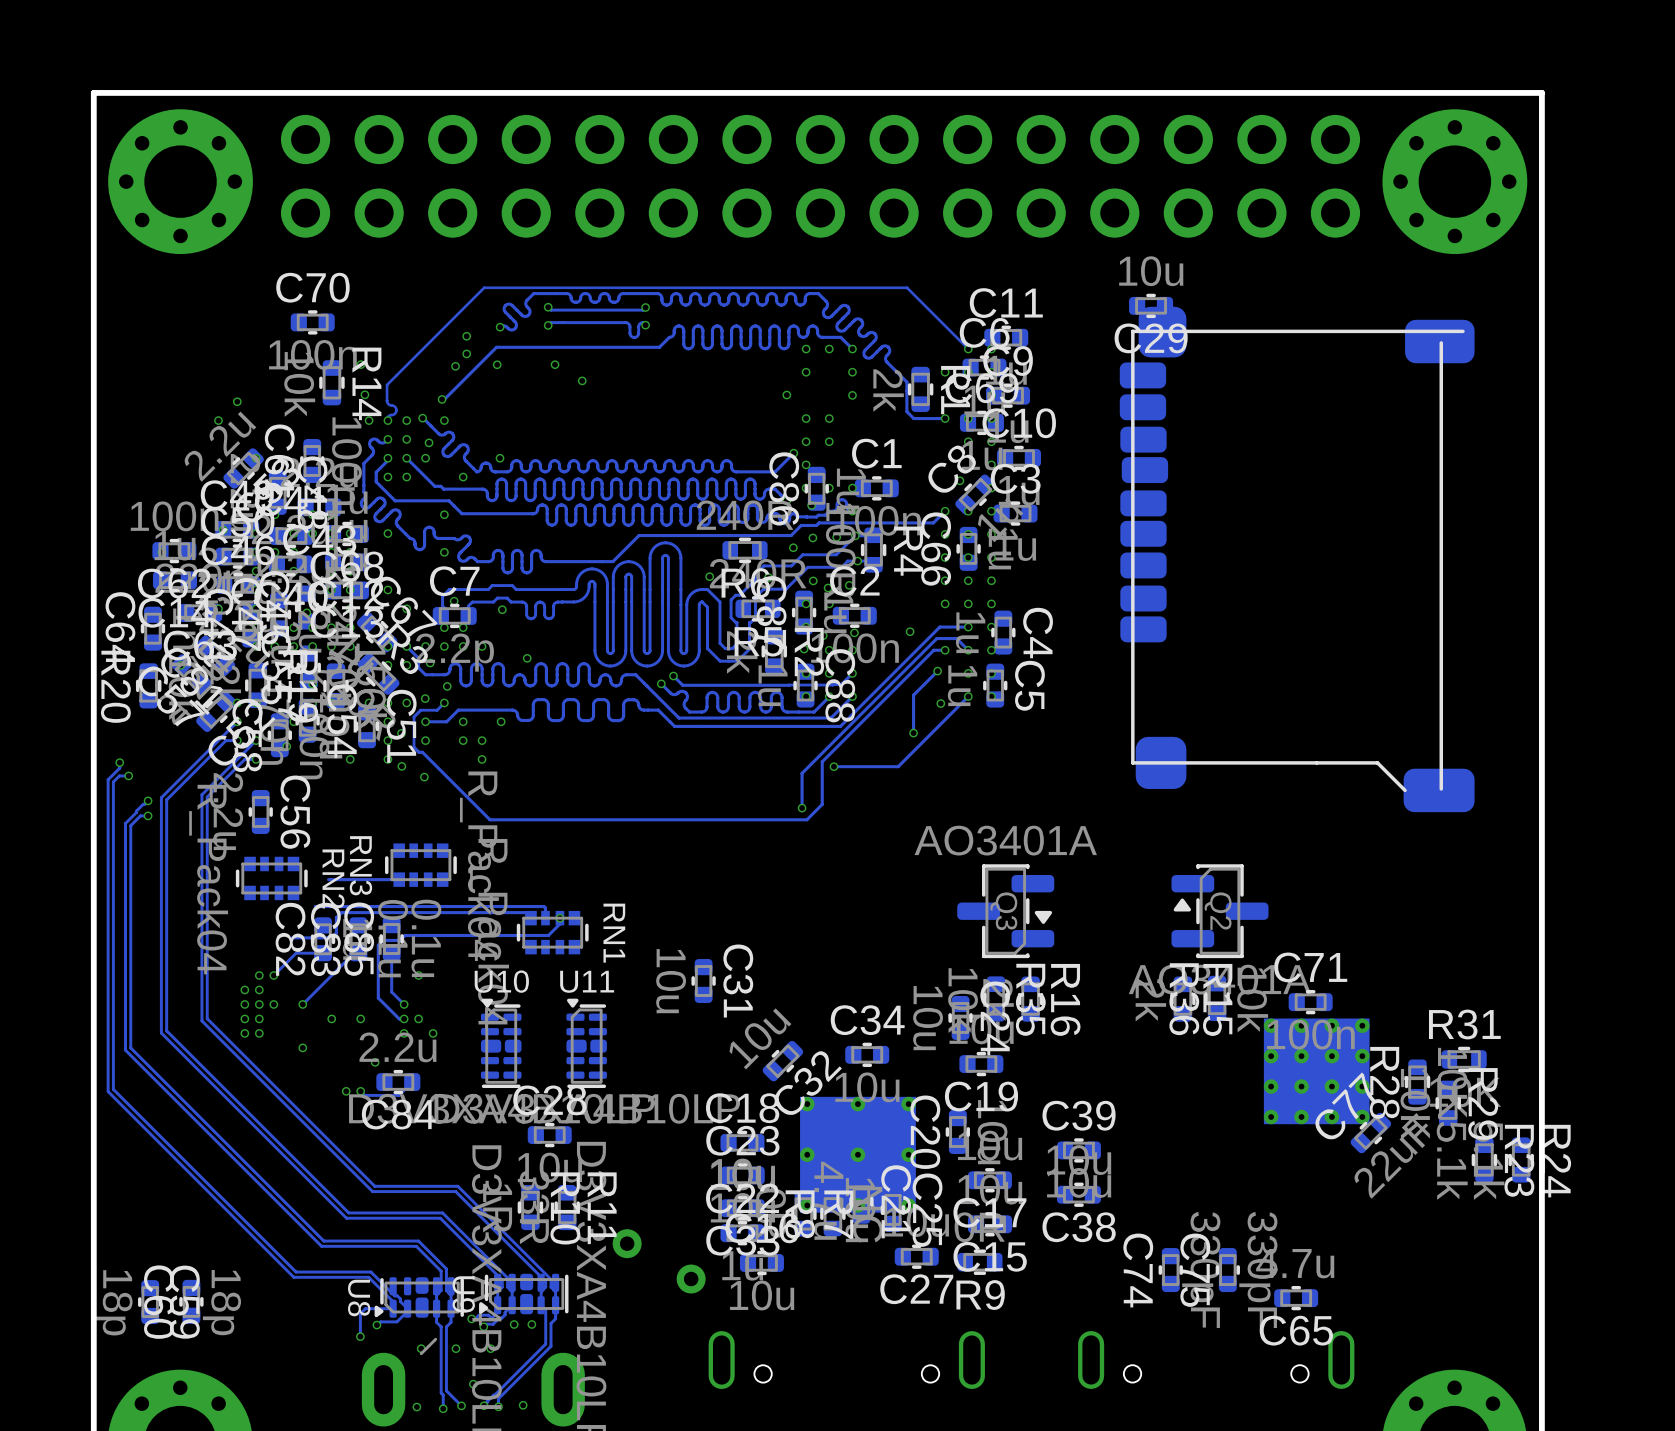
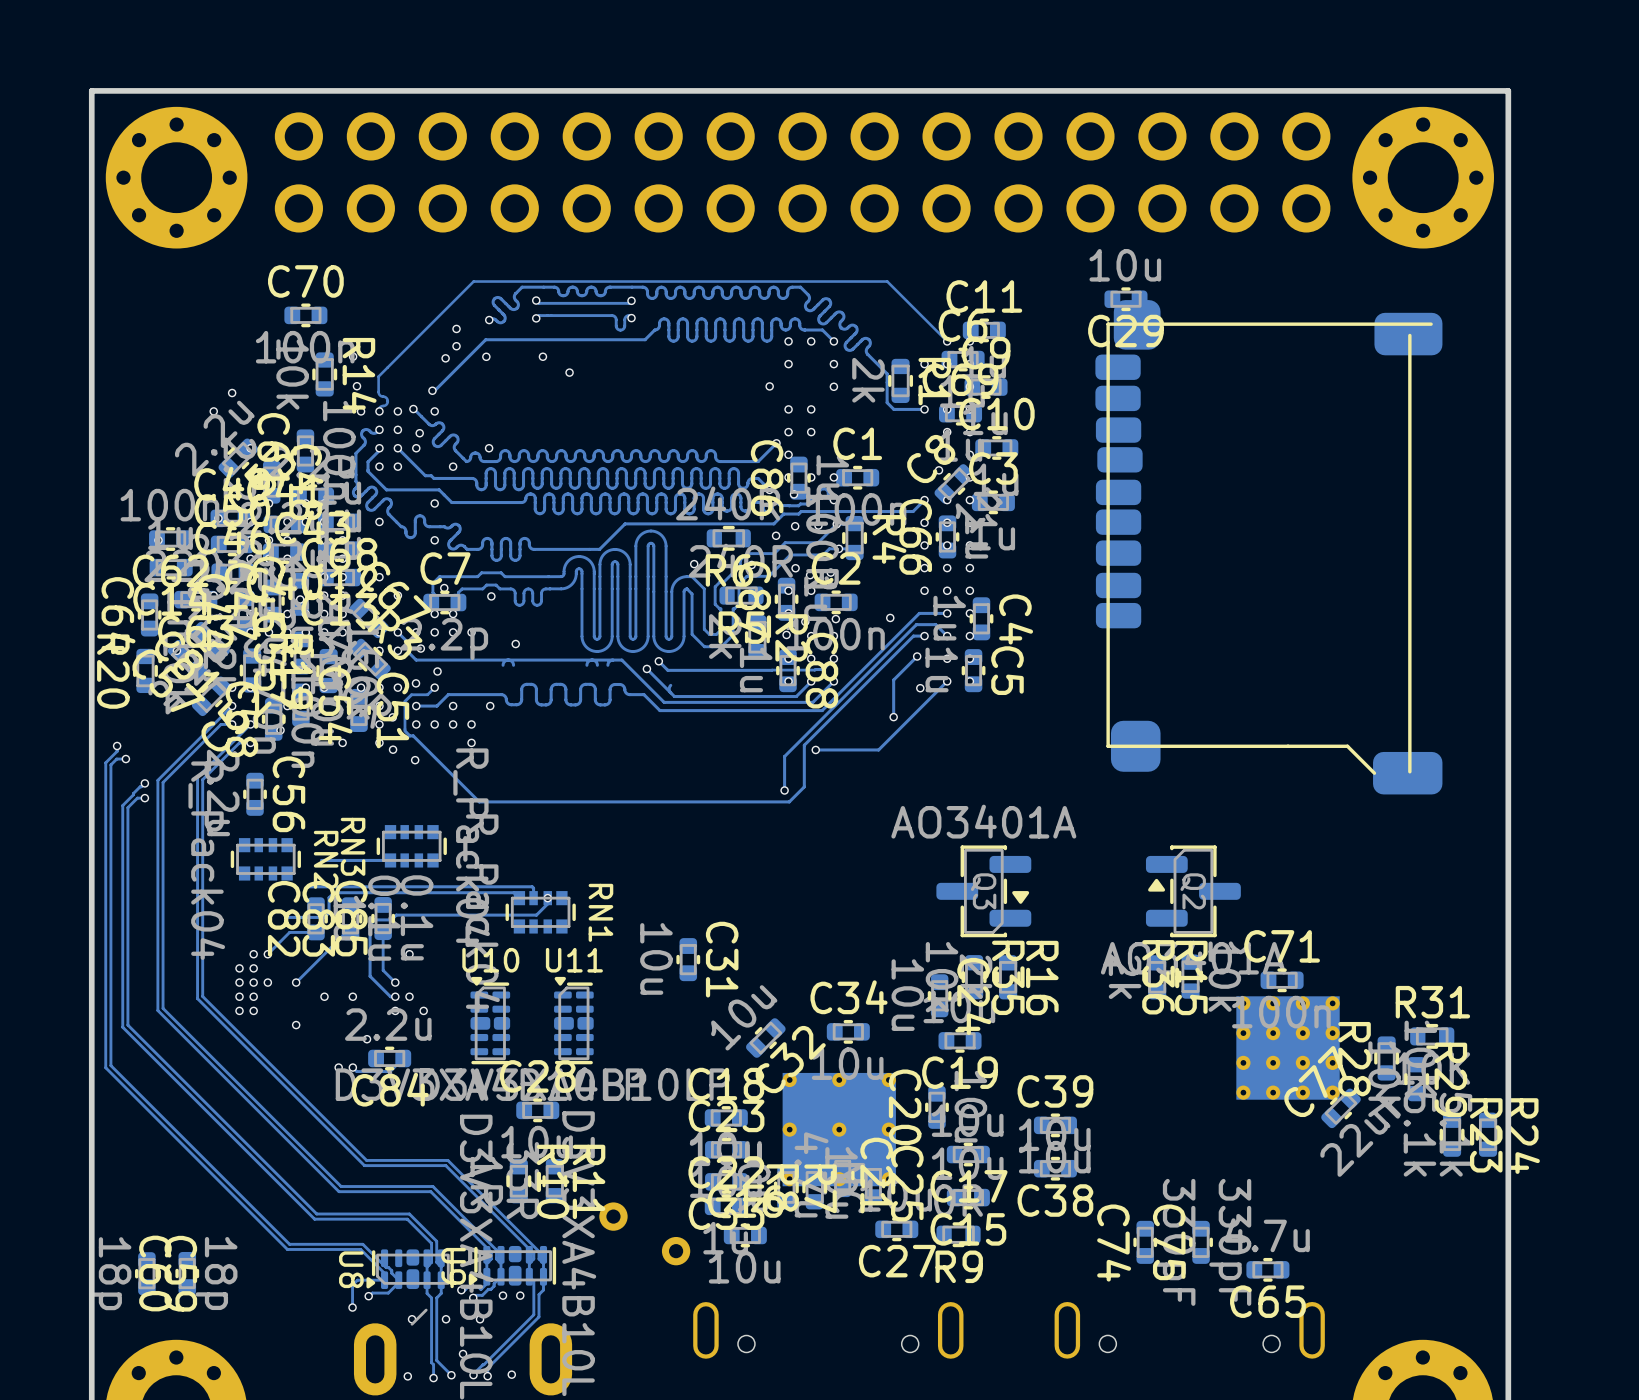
track: (449, 669) (448, 673) (444, 674) -> (613, 660) (434, 660)
track: (449, 669) (453, 663) (459, 665) (460, 681) (464, 685) (470, 682) (471, 667) (476, 663) (481, 666) (482, 681) (485, 685) (492, 683) (492, 667) (497, 663) (503, 667) (505, 684) (511, 685) (514, 680) -> none
track: (600, 680) (596, 685) (590, 684) (588, 667) (583, 663) (579, 666) (578, 681) (574, 685) (568, 682) (567, 667) (563, 663) (557, 666) (557, 681) (554, 685) (547, 683) (546, 667) (541, 663) (536, 667) (534, 684) (528, 685) (524, 680) -> none
track: (621, 680) (619, 684) (616, 685) (612, 684) (610, 680) -> none
track: (678, 692) (682, 691) (685, 692) (687, 696) (685, 700) -> none
track: (678, 693) (674, 694) (670, 693) -> (670, 692) (655, 677)
track: (787, 712) (782, 709) (781, 695) (776, 692) (771, 695) (771, 708) (765, 712) (761, 709) (760, 696) (757, 692) (750, 694) (749, 708) (744, 712) (739, 708) (738, 694) (730, 693) (728, 696) (727, 709) (723, 712) (718, 708) (716, 694) (711, 692) (707, 696) (706, 709) (701, 712) -> (770, 696) (686, 696)
via: none -> (434, 724)

